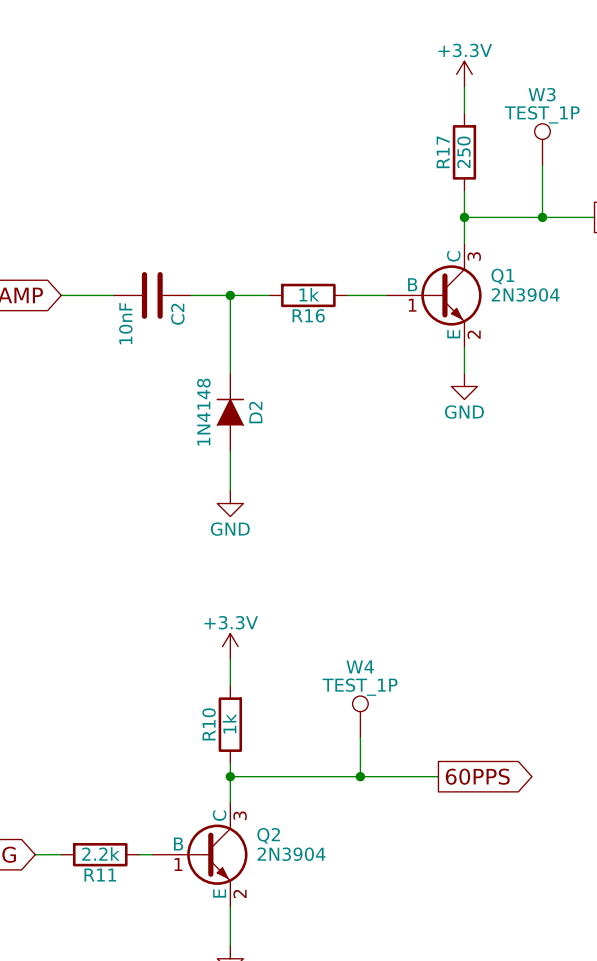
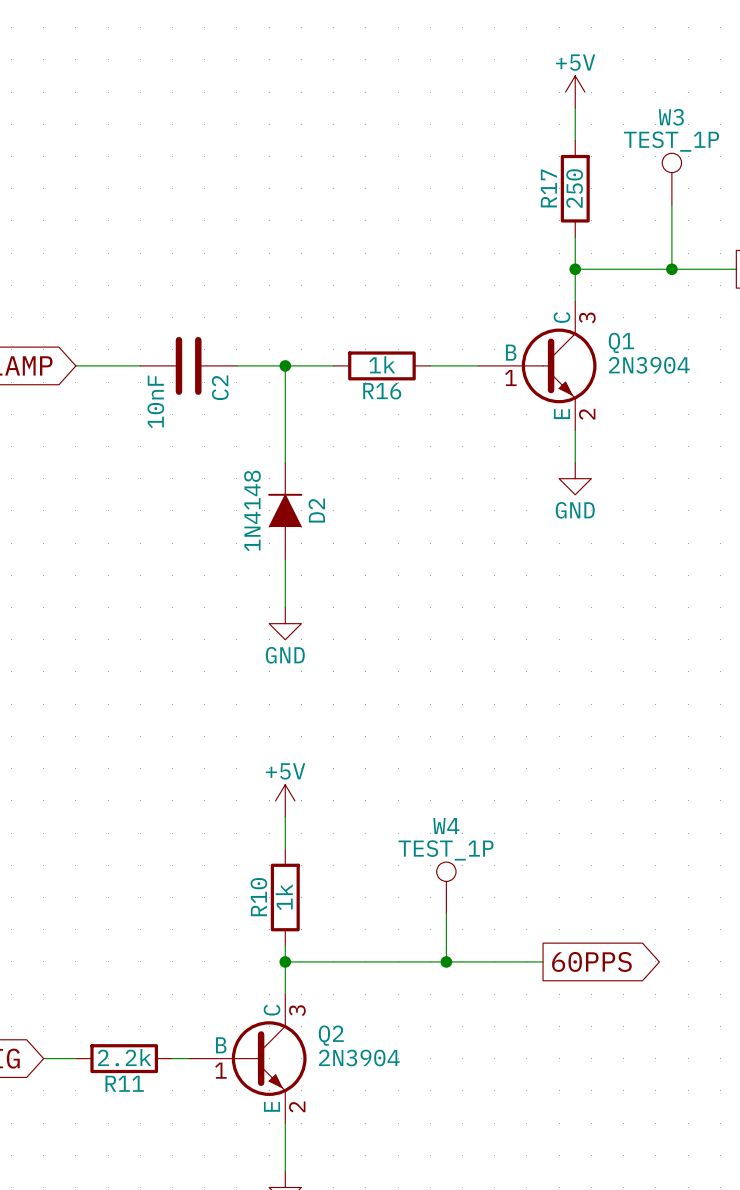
power symbol: +3.3V (464, 74) -> +5V (575, 92)
power symbol: +3.3V (230, 646) -> +5V (285, 800)

